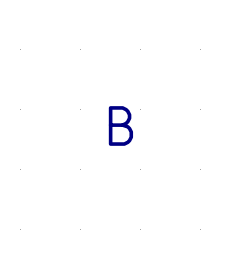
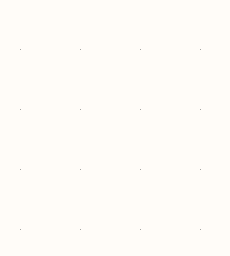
text: B (120, 125) -> none

